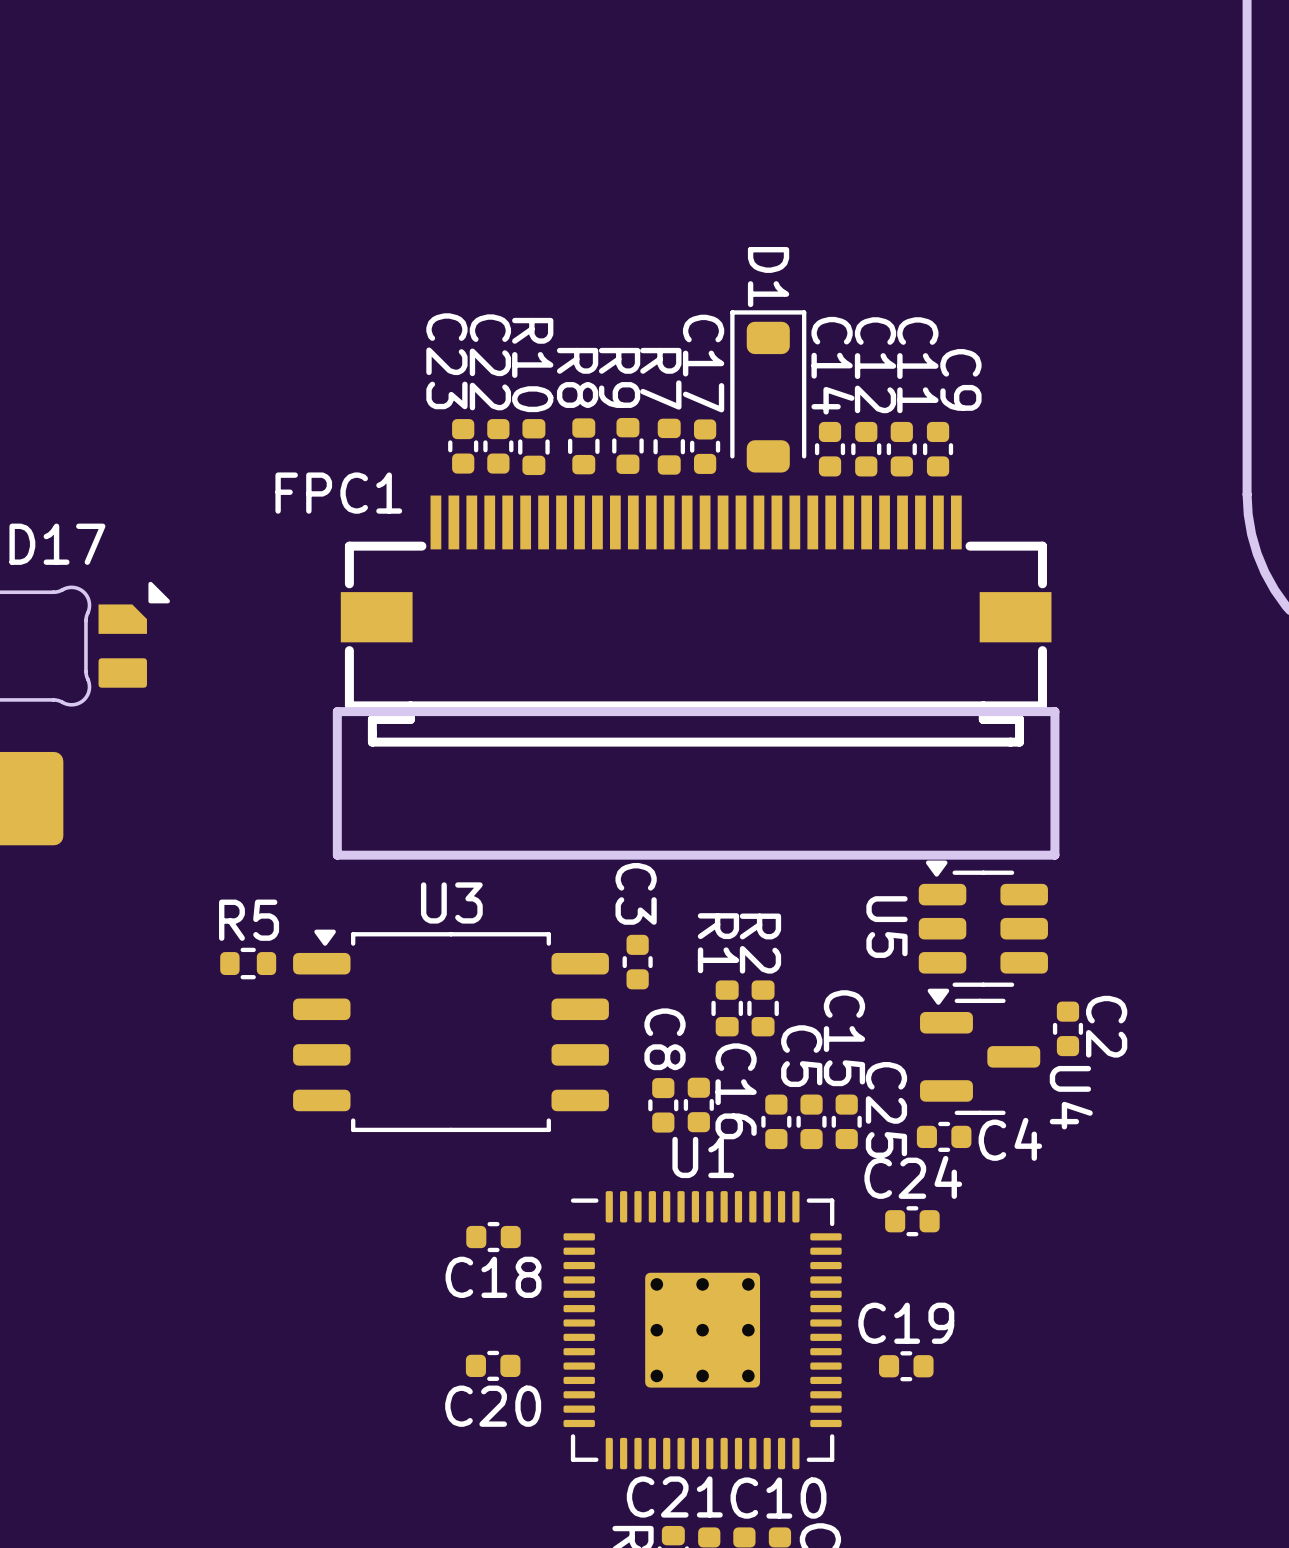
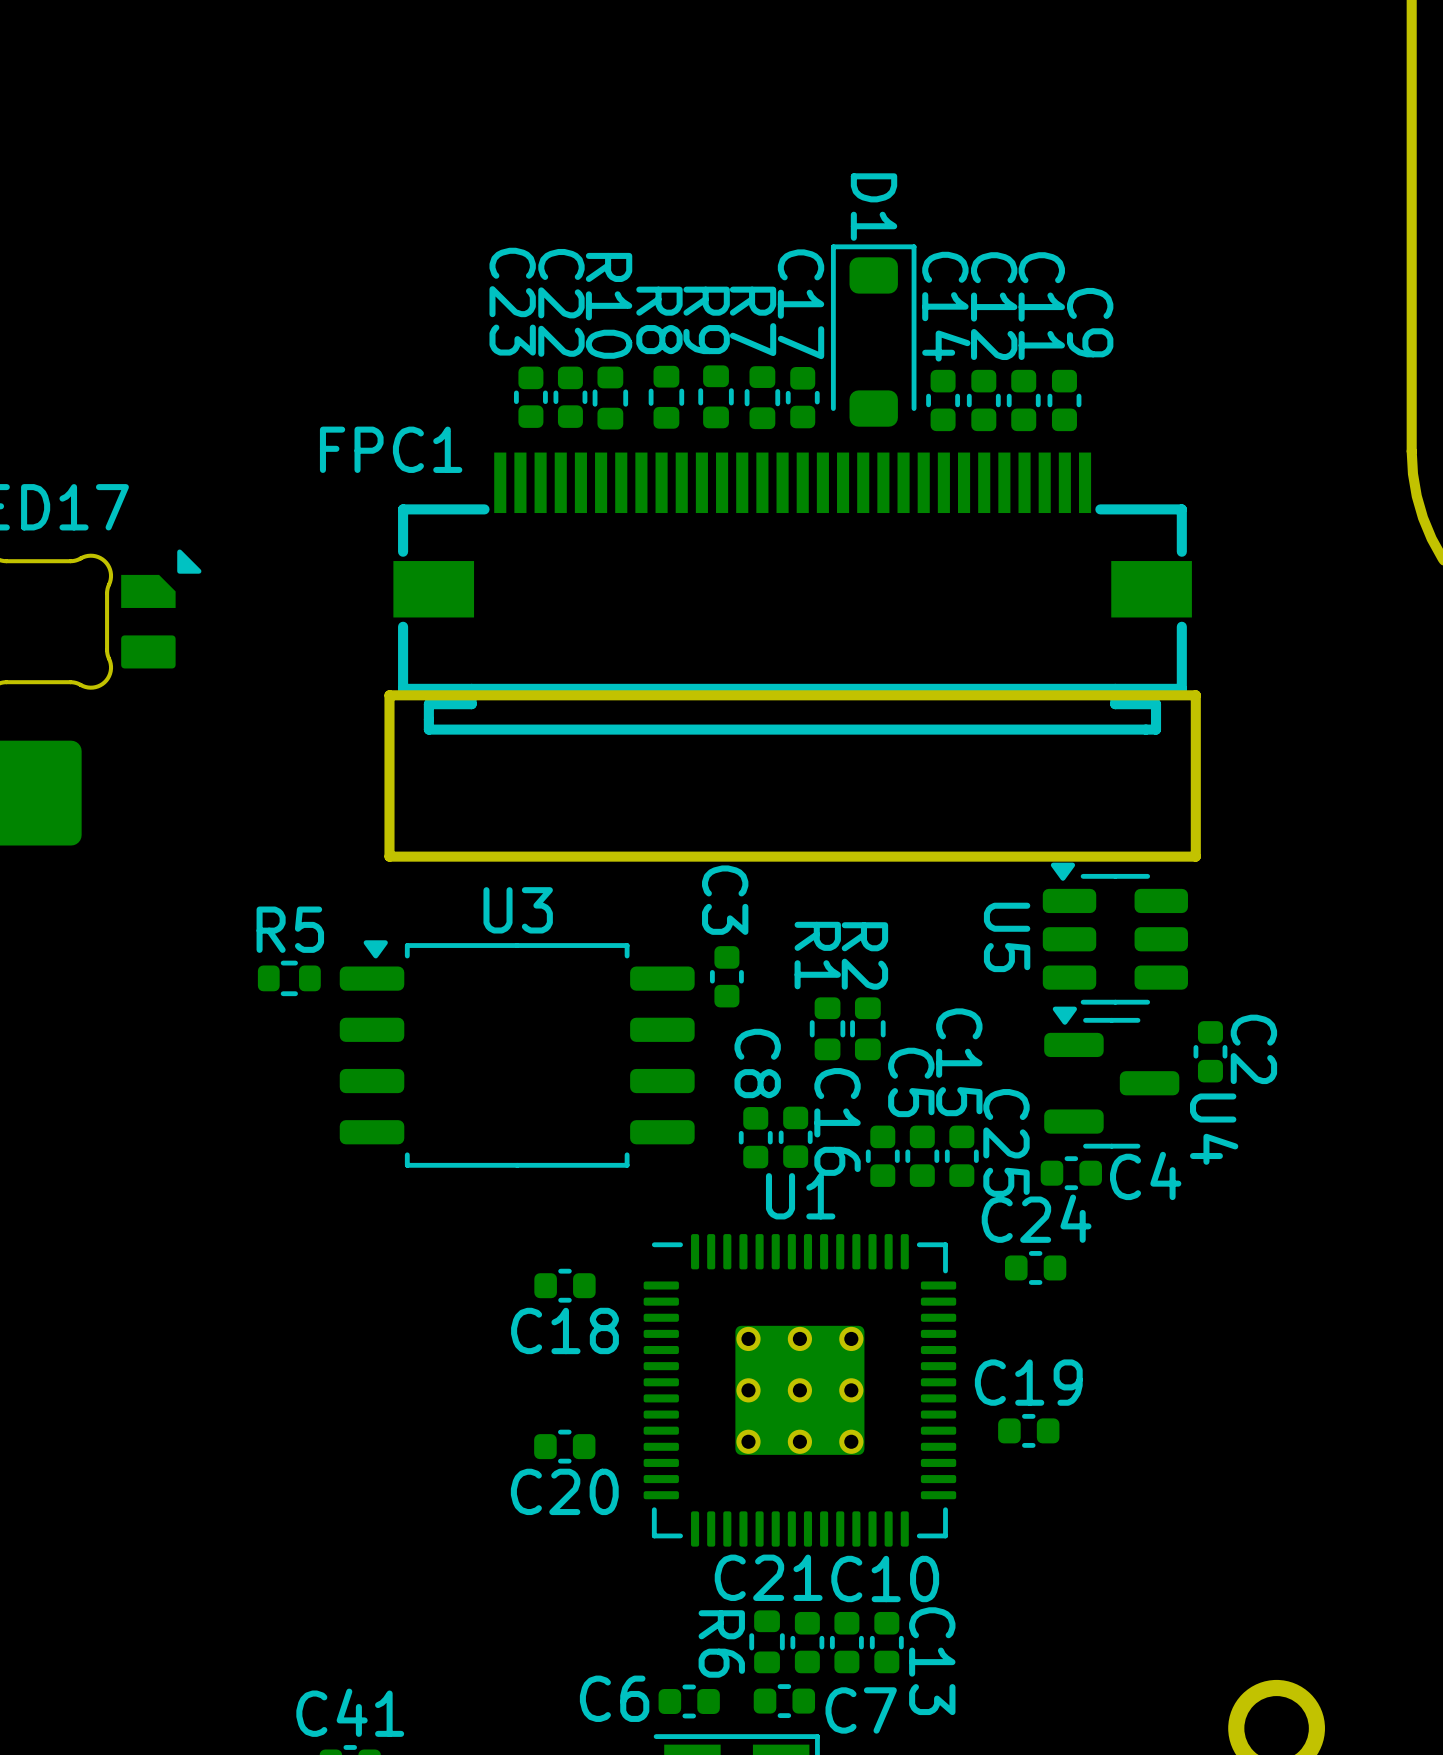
C20 position: (493, 1365) -> (564, 1446)

